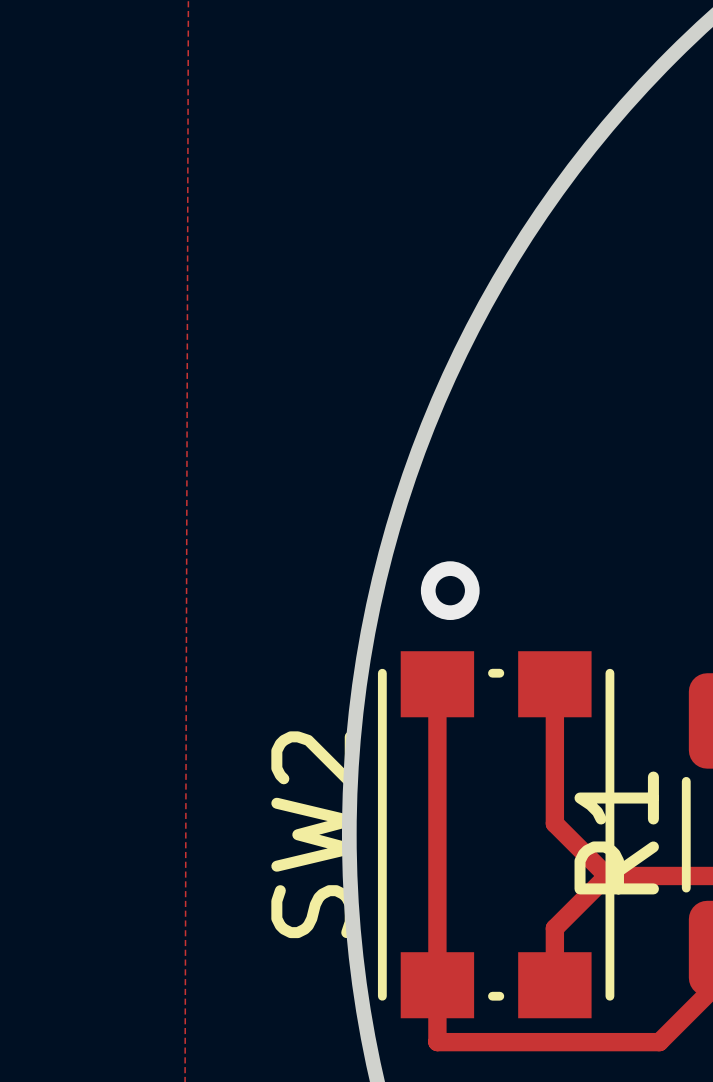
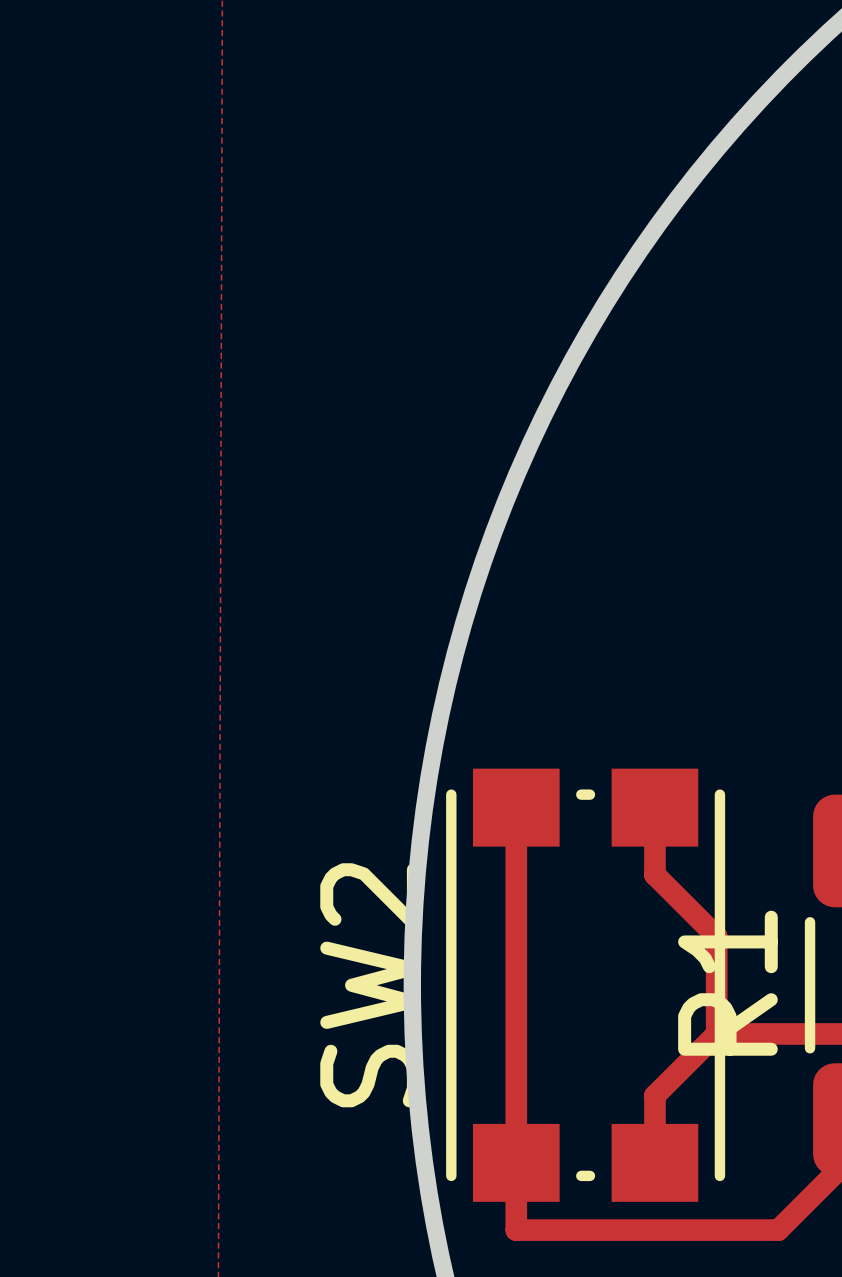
via: (450, 590) -> none
track: (554, 741) (554, 823) (607, 875) -> (654, 874) (716, 936) (716, 1033)

